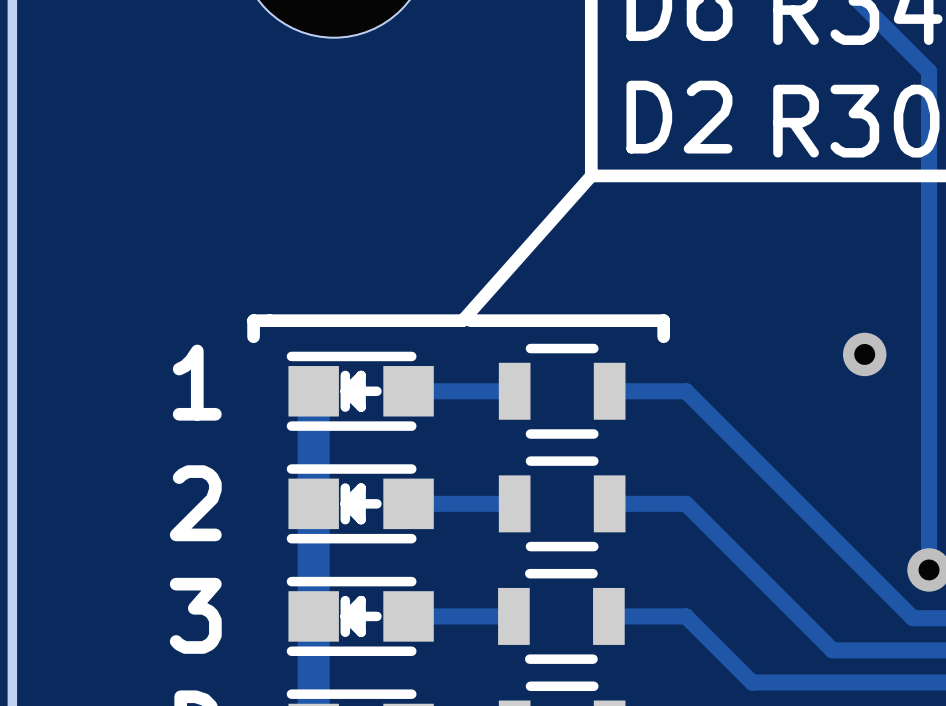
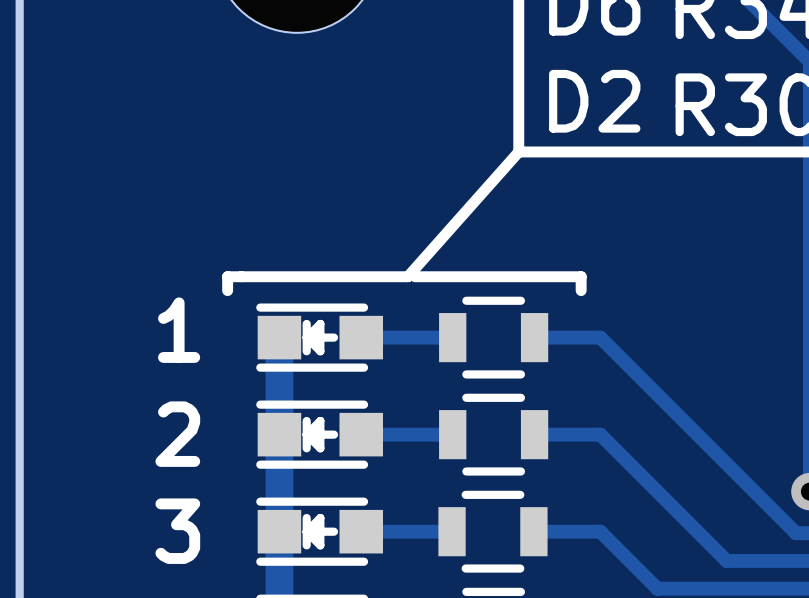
via: (864, 354) -> none

